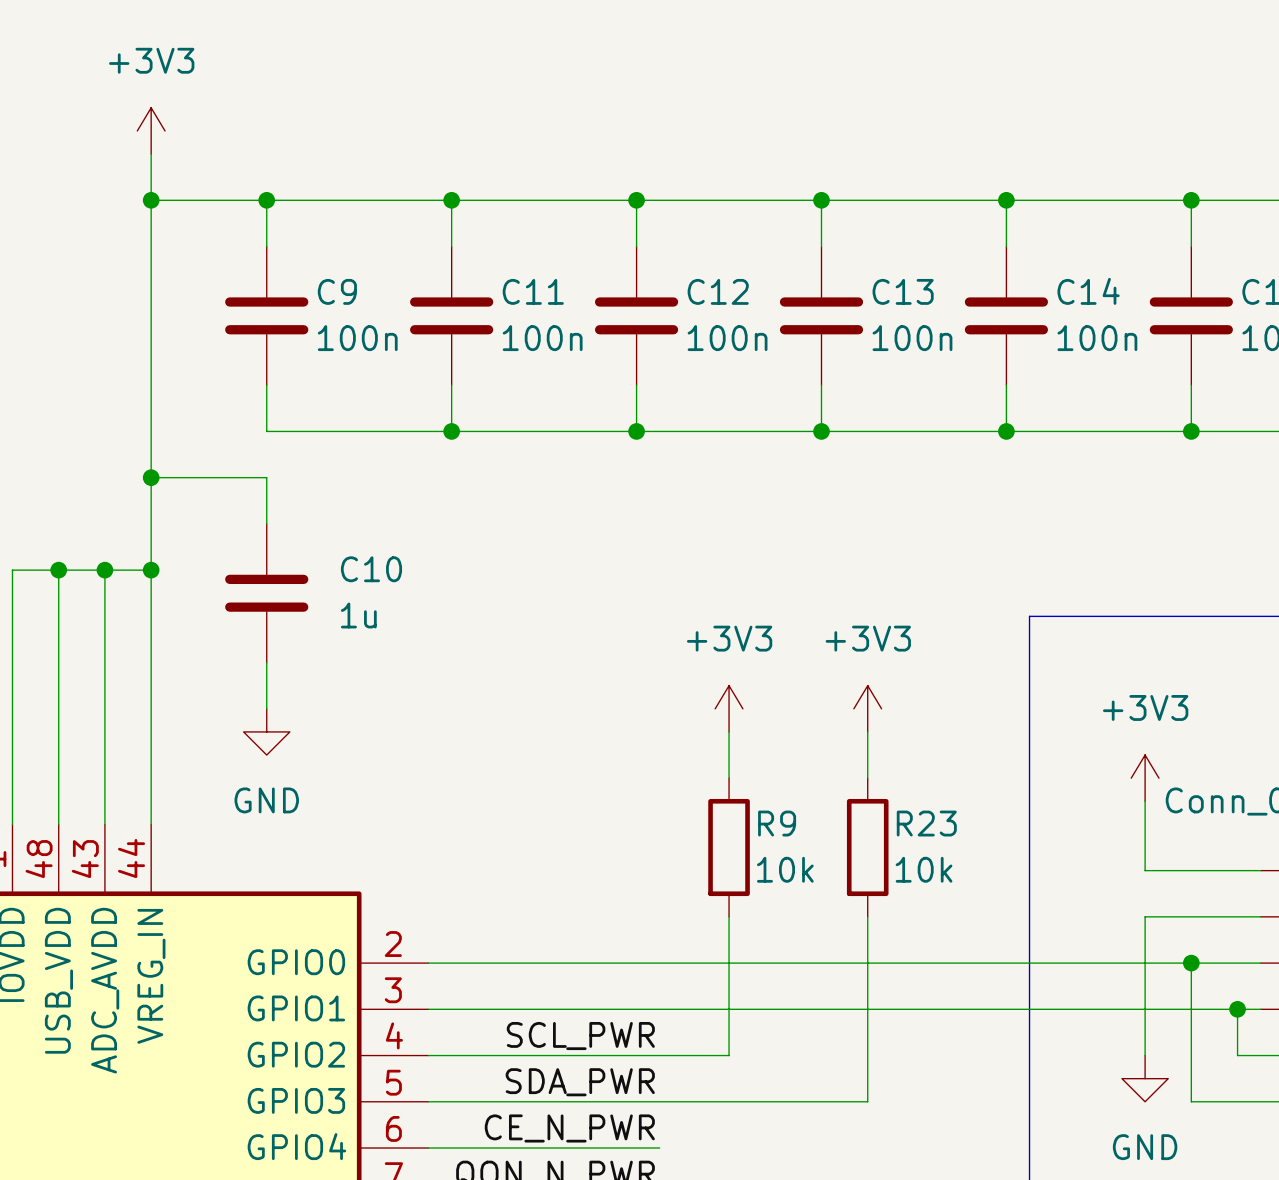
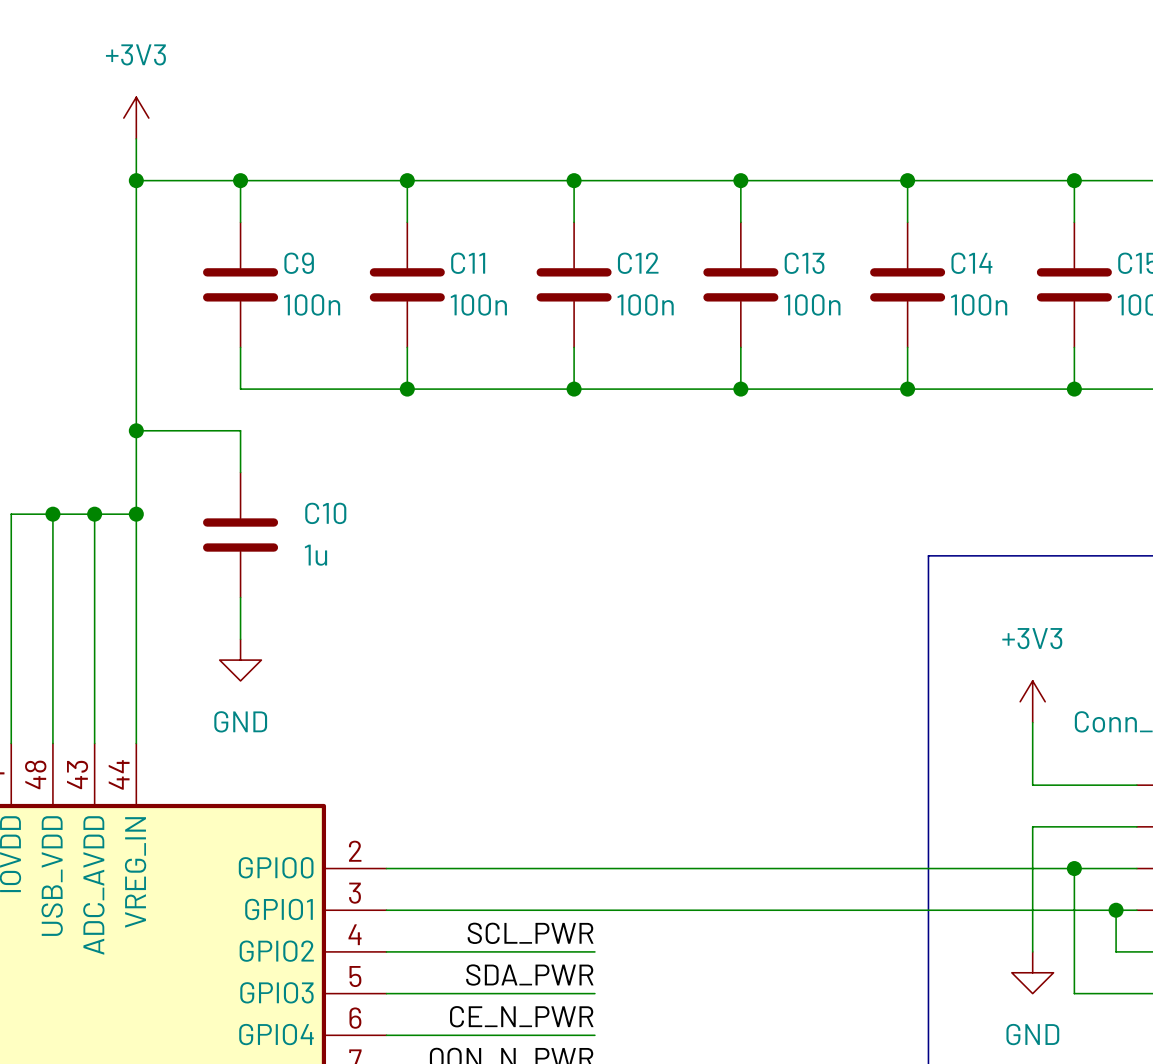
power symbol: +3V3 (729, 708) -> none
power symbol: +3V3 (867, 708) -> none
wire: (729, 731) (729, 778) -> none
wire: (867, 731) (867, 778) -> none
R9: 10k (729, 847) -> none
R23: 10k (867, 847) -> none
wire: (729, 916) (729, 1055) (659, 1055) -> none
wire: (867, 916) (867, 1101) (659, 1101) -> none

